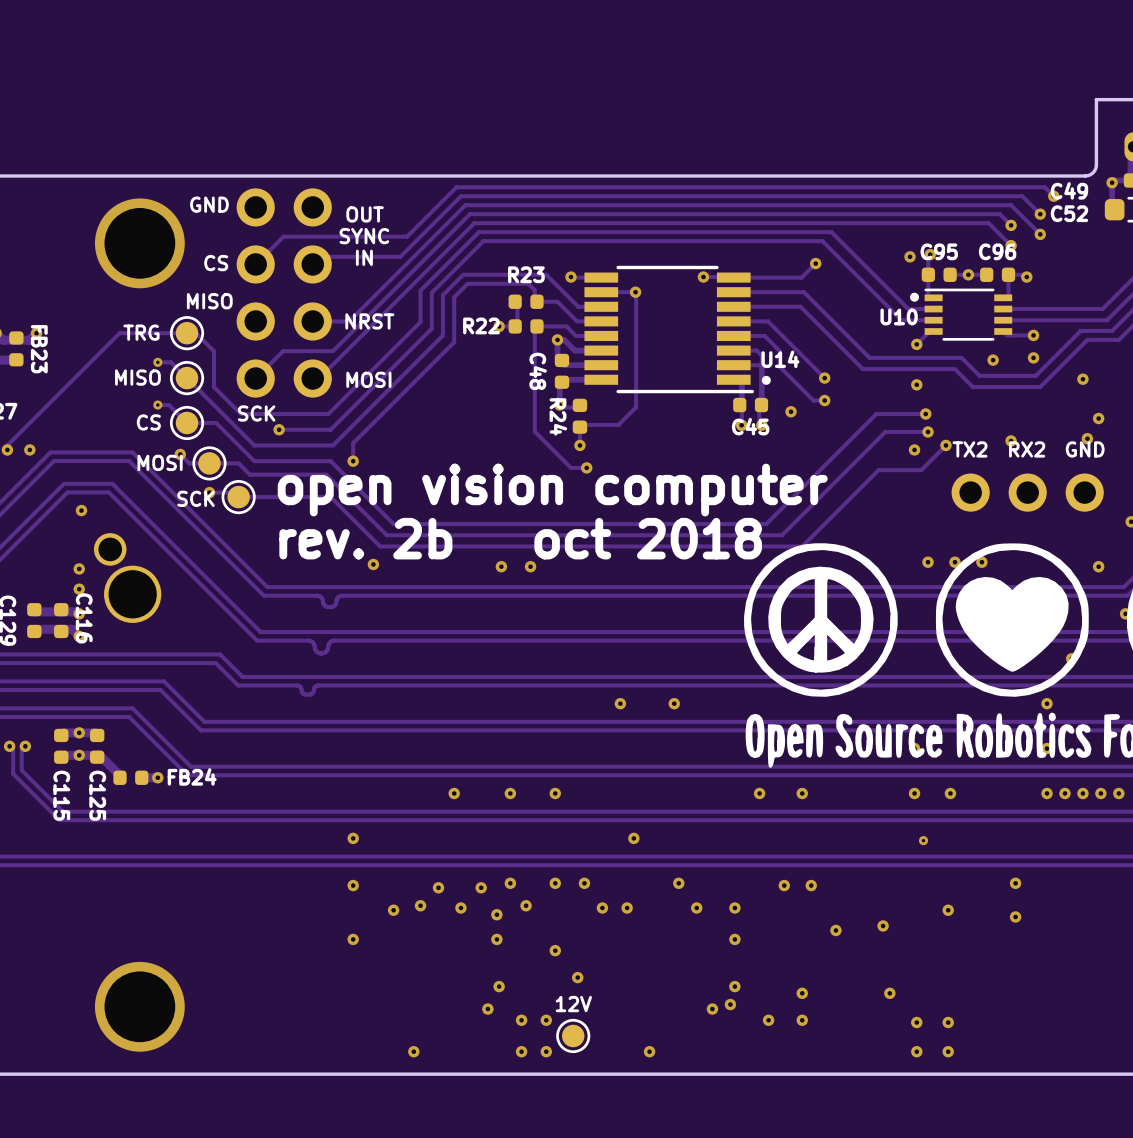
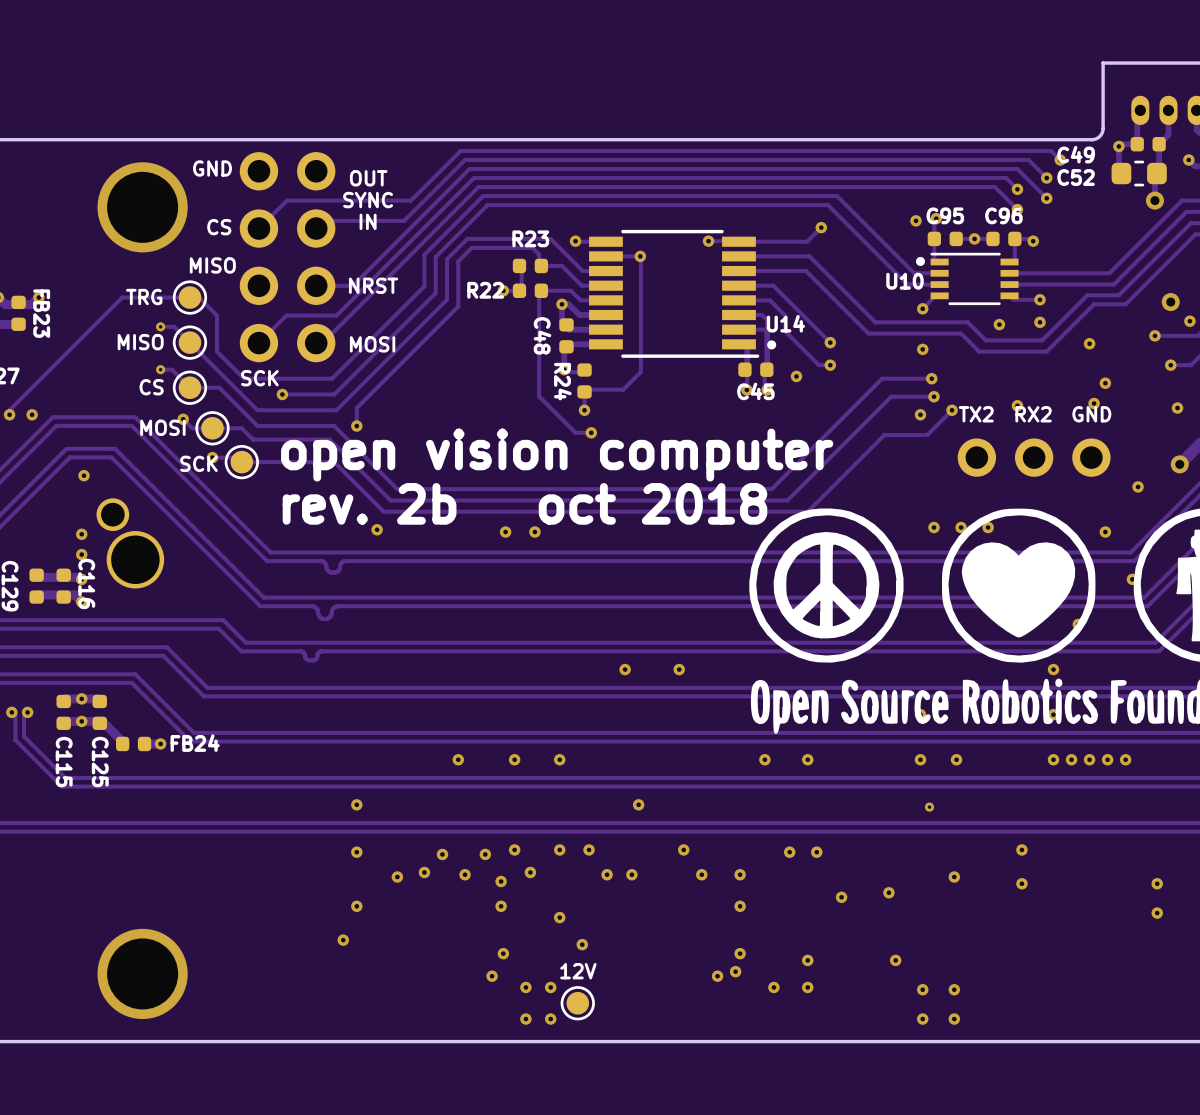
via: none -> (343, 940)
via: (413, 1051) -> none
via: (649, 1051) -> none

